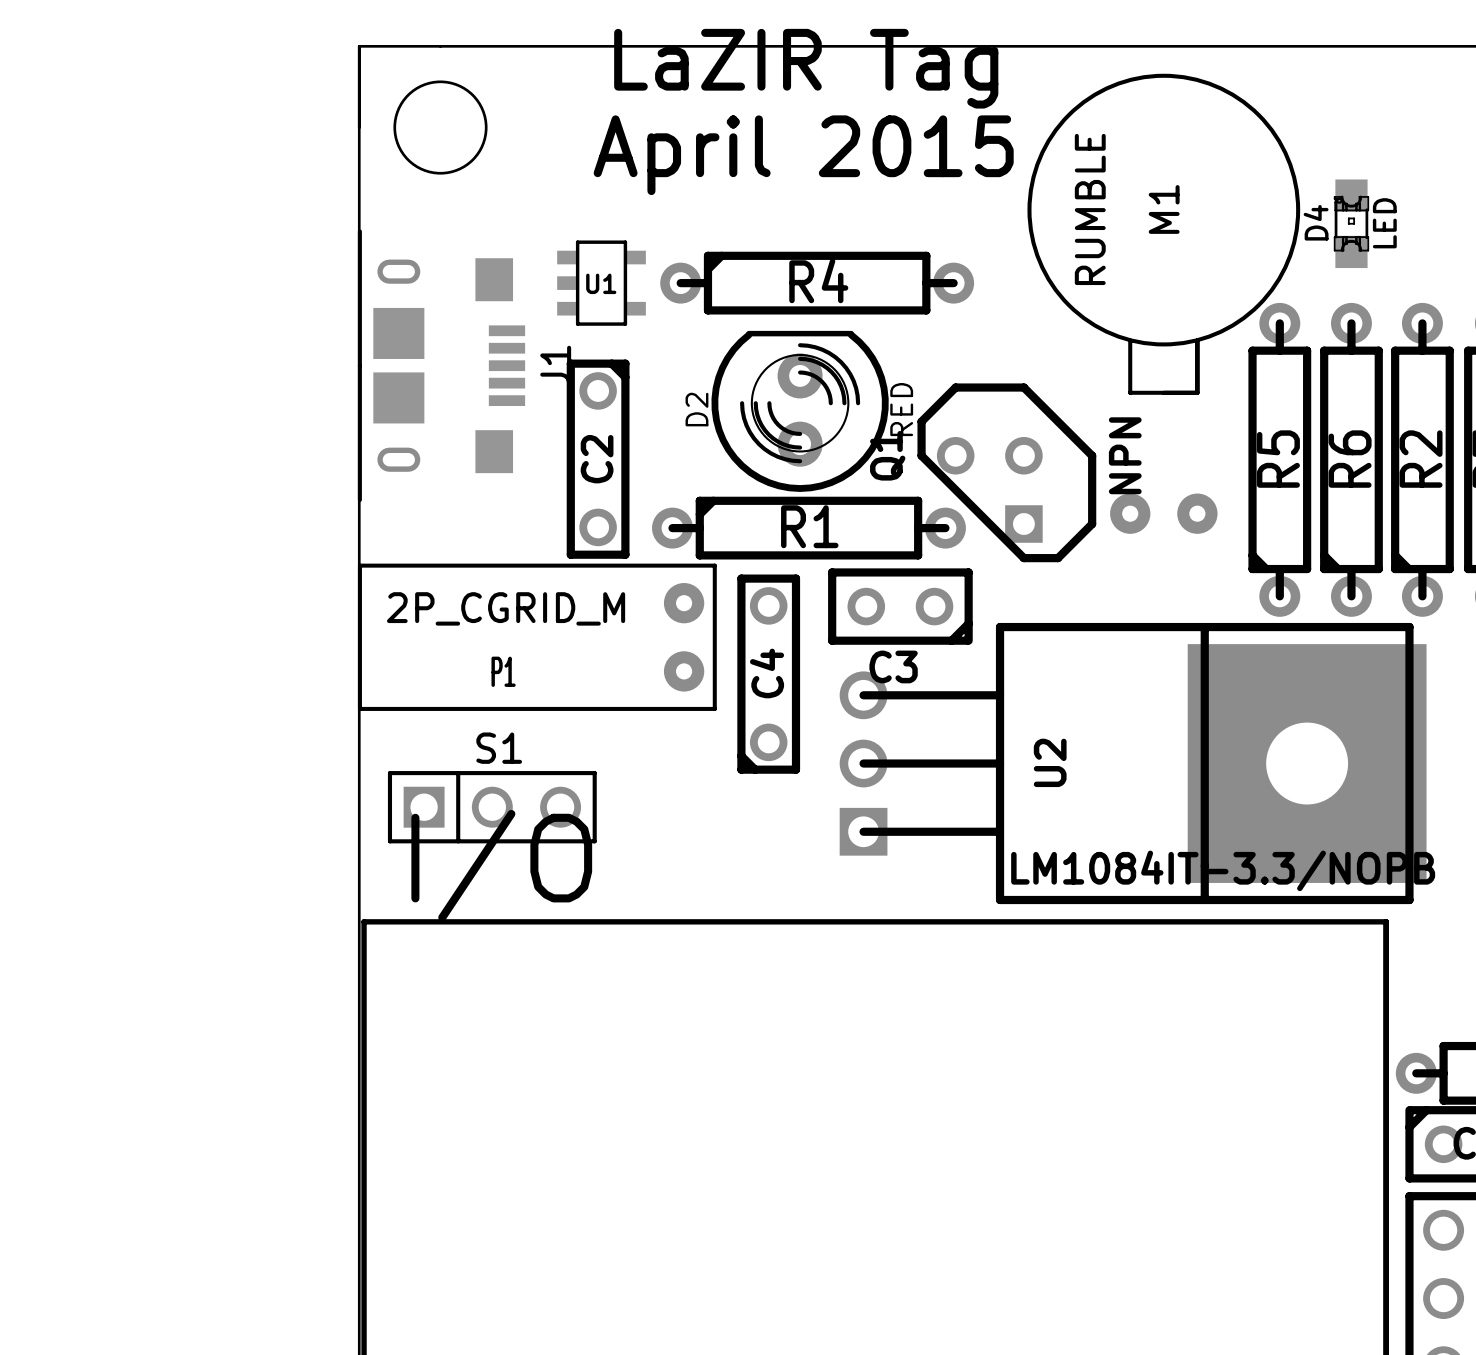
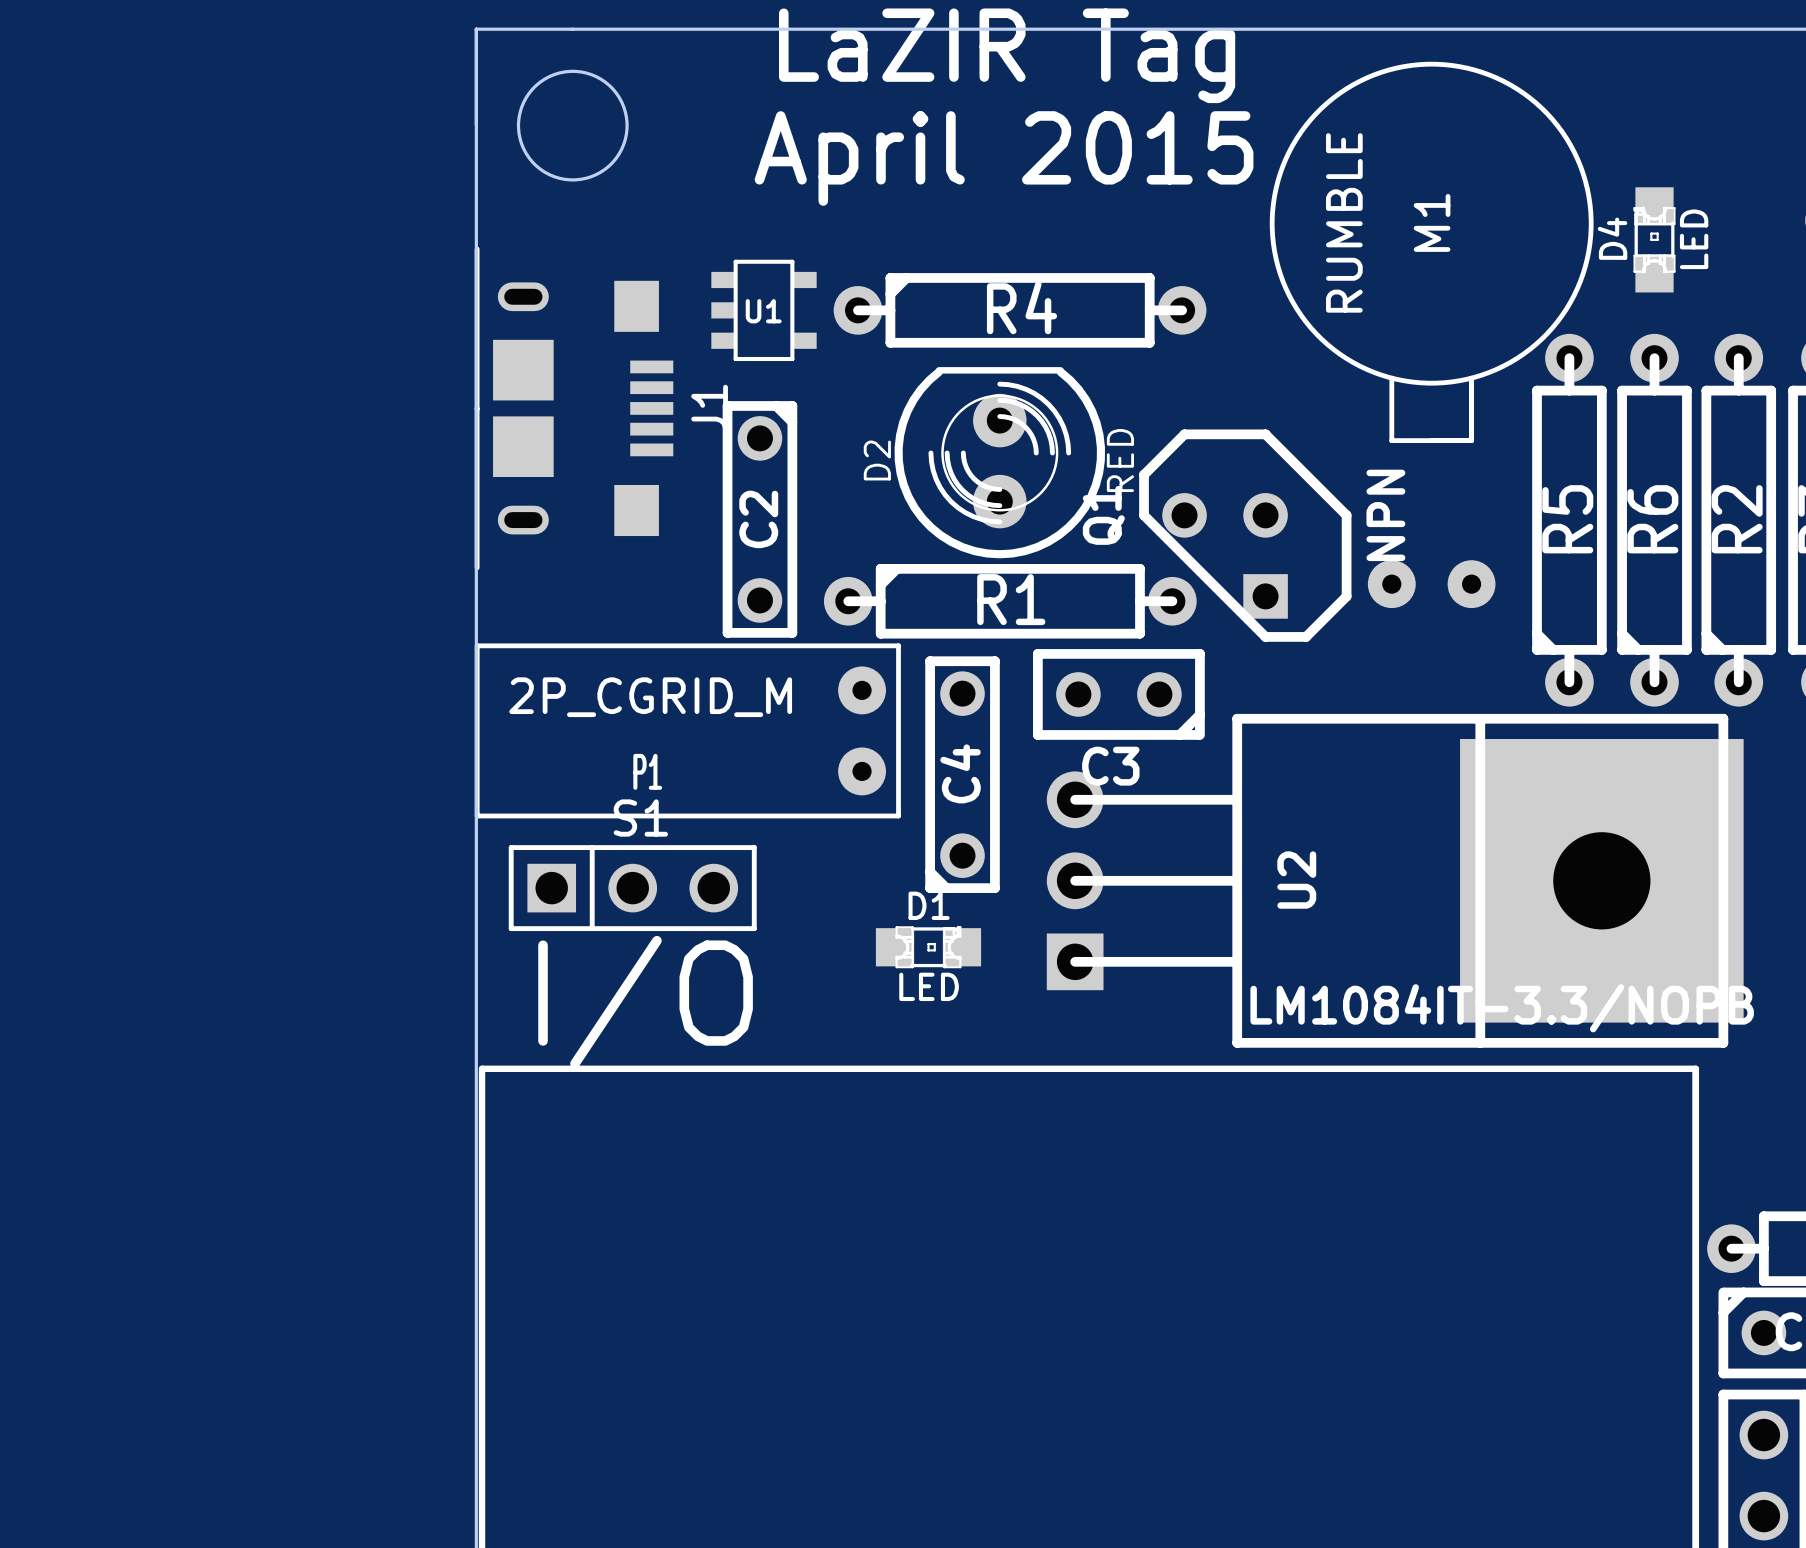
S1 position: (492, 807) -> (632, 888)
D1: none -> LED (928, 947)

